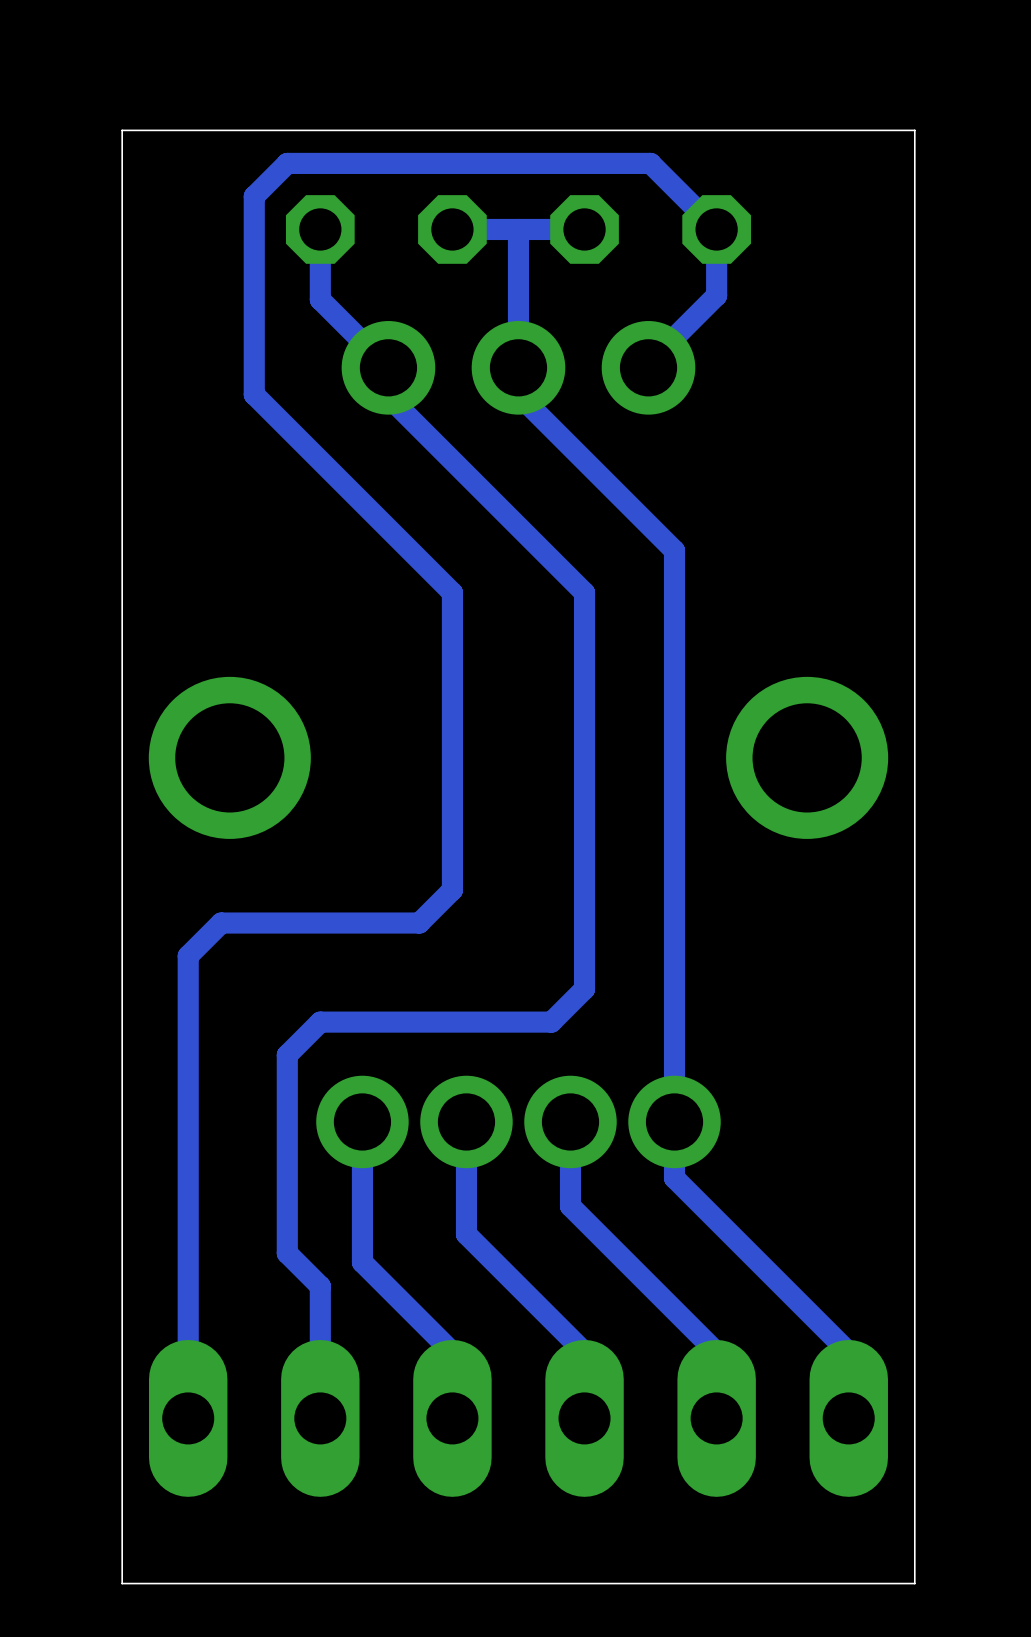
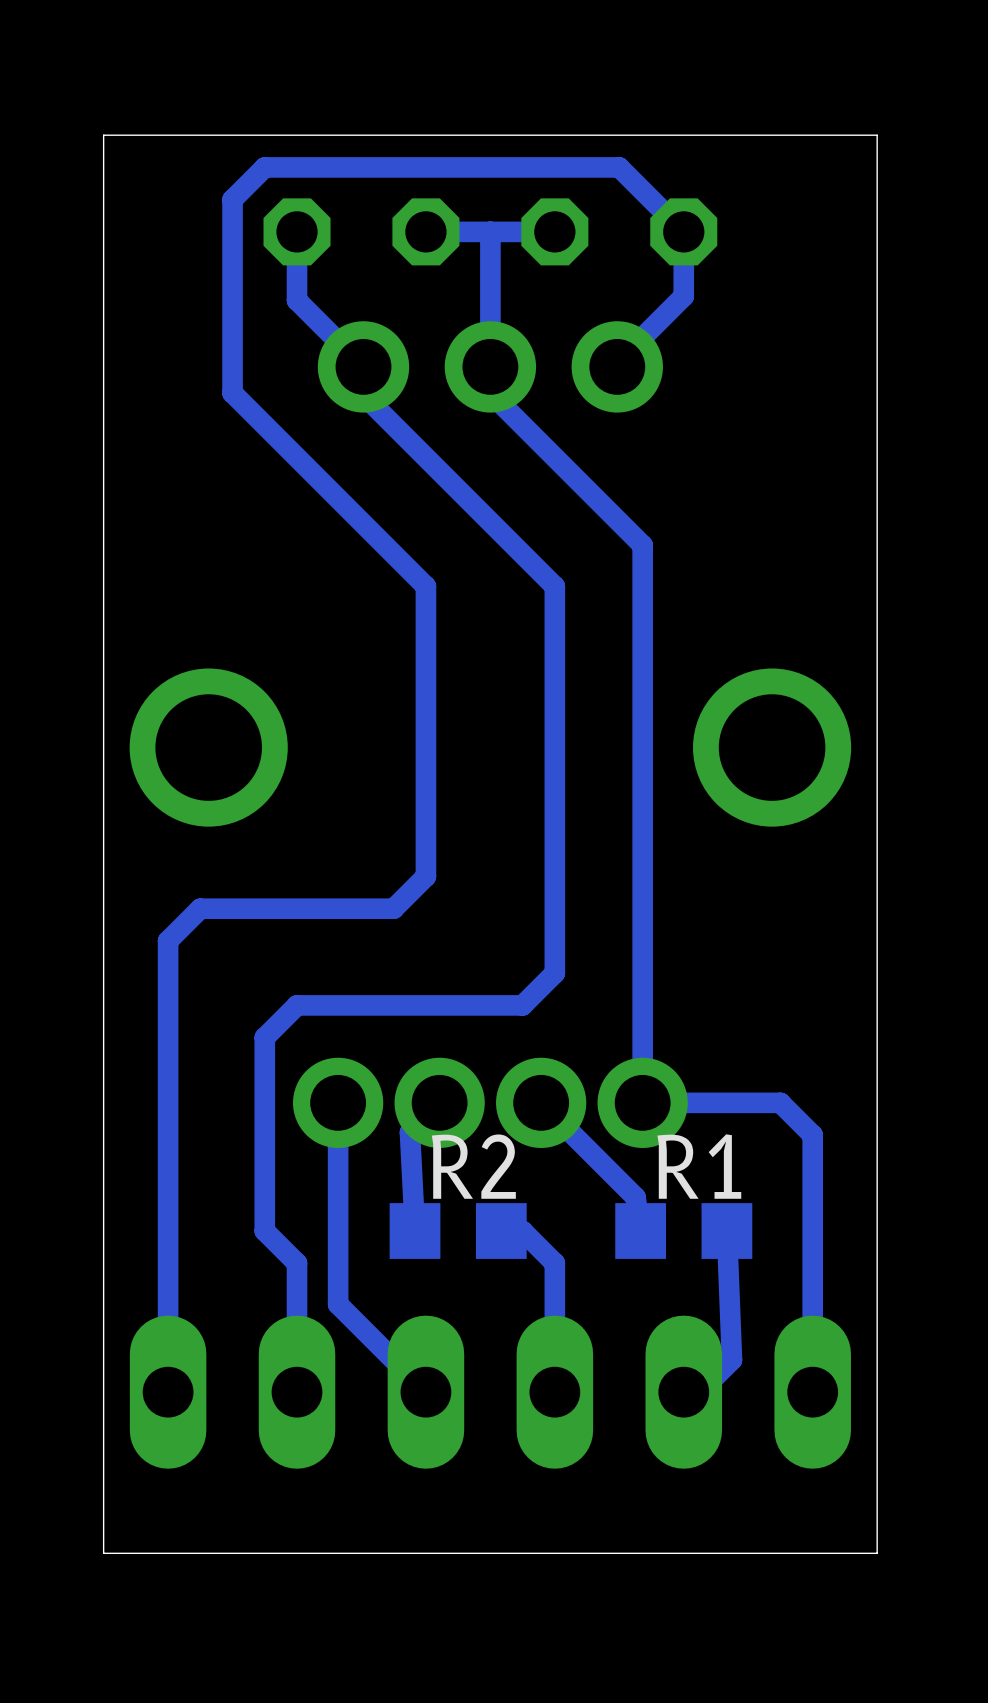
bottom track: (466, 1121) (466, 1234) (584, 1352) -> (501, 1231) (522, 1231) (554, 1263) (554, 1327)
bottom track: none -> (439, 1102) (409, 1132) (415, 1231)
bottom track: (570, 1121) (570, 1206) (716, 1352) (716, 1418) -> (541, 1102) (635, 1197) (640, 1231)
bottom track: (674, 1121) (674, 1178) (848, 1352) -> (642, 1102) (780, 1102) (812, 1135) (812, 1327)
R2: none -> (458, 1231)
R1: none -> (683, 1231)
bottom track: none -> (726, 1231) (731, 1359) (699, 1392) (683, 1392)
bottom track: (362, 1262) (452, 1352) (452, 1418) -> (338, 1239) (338, 1304) (425, 1392)

